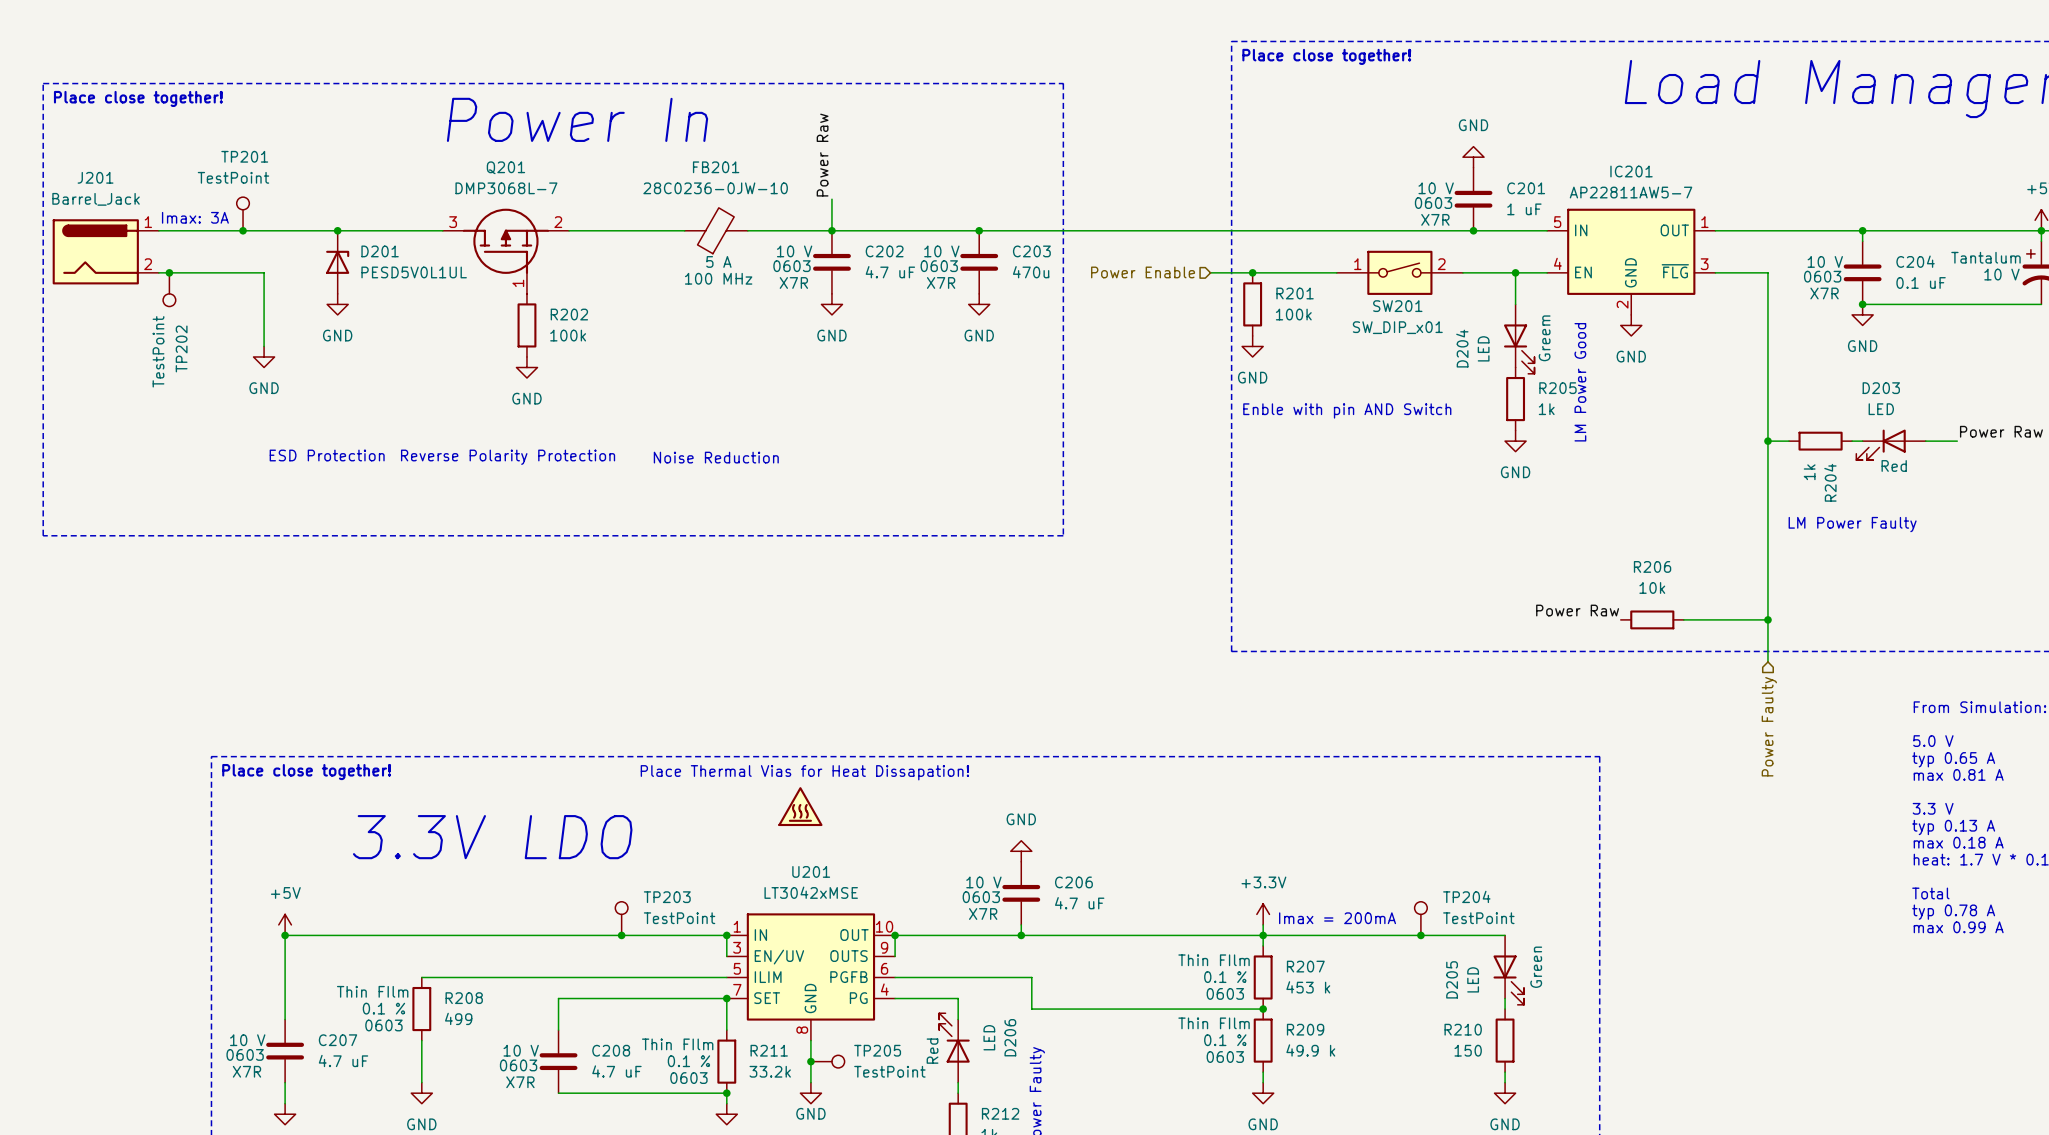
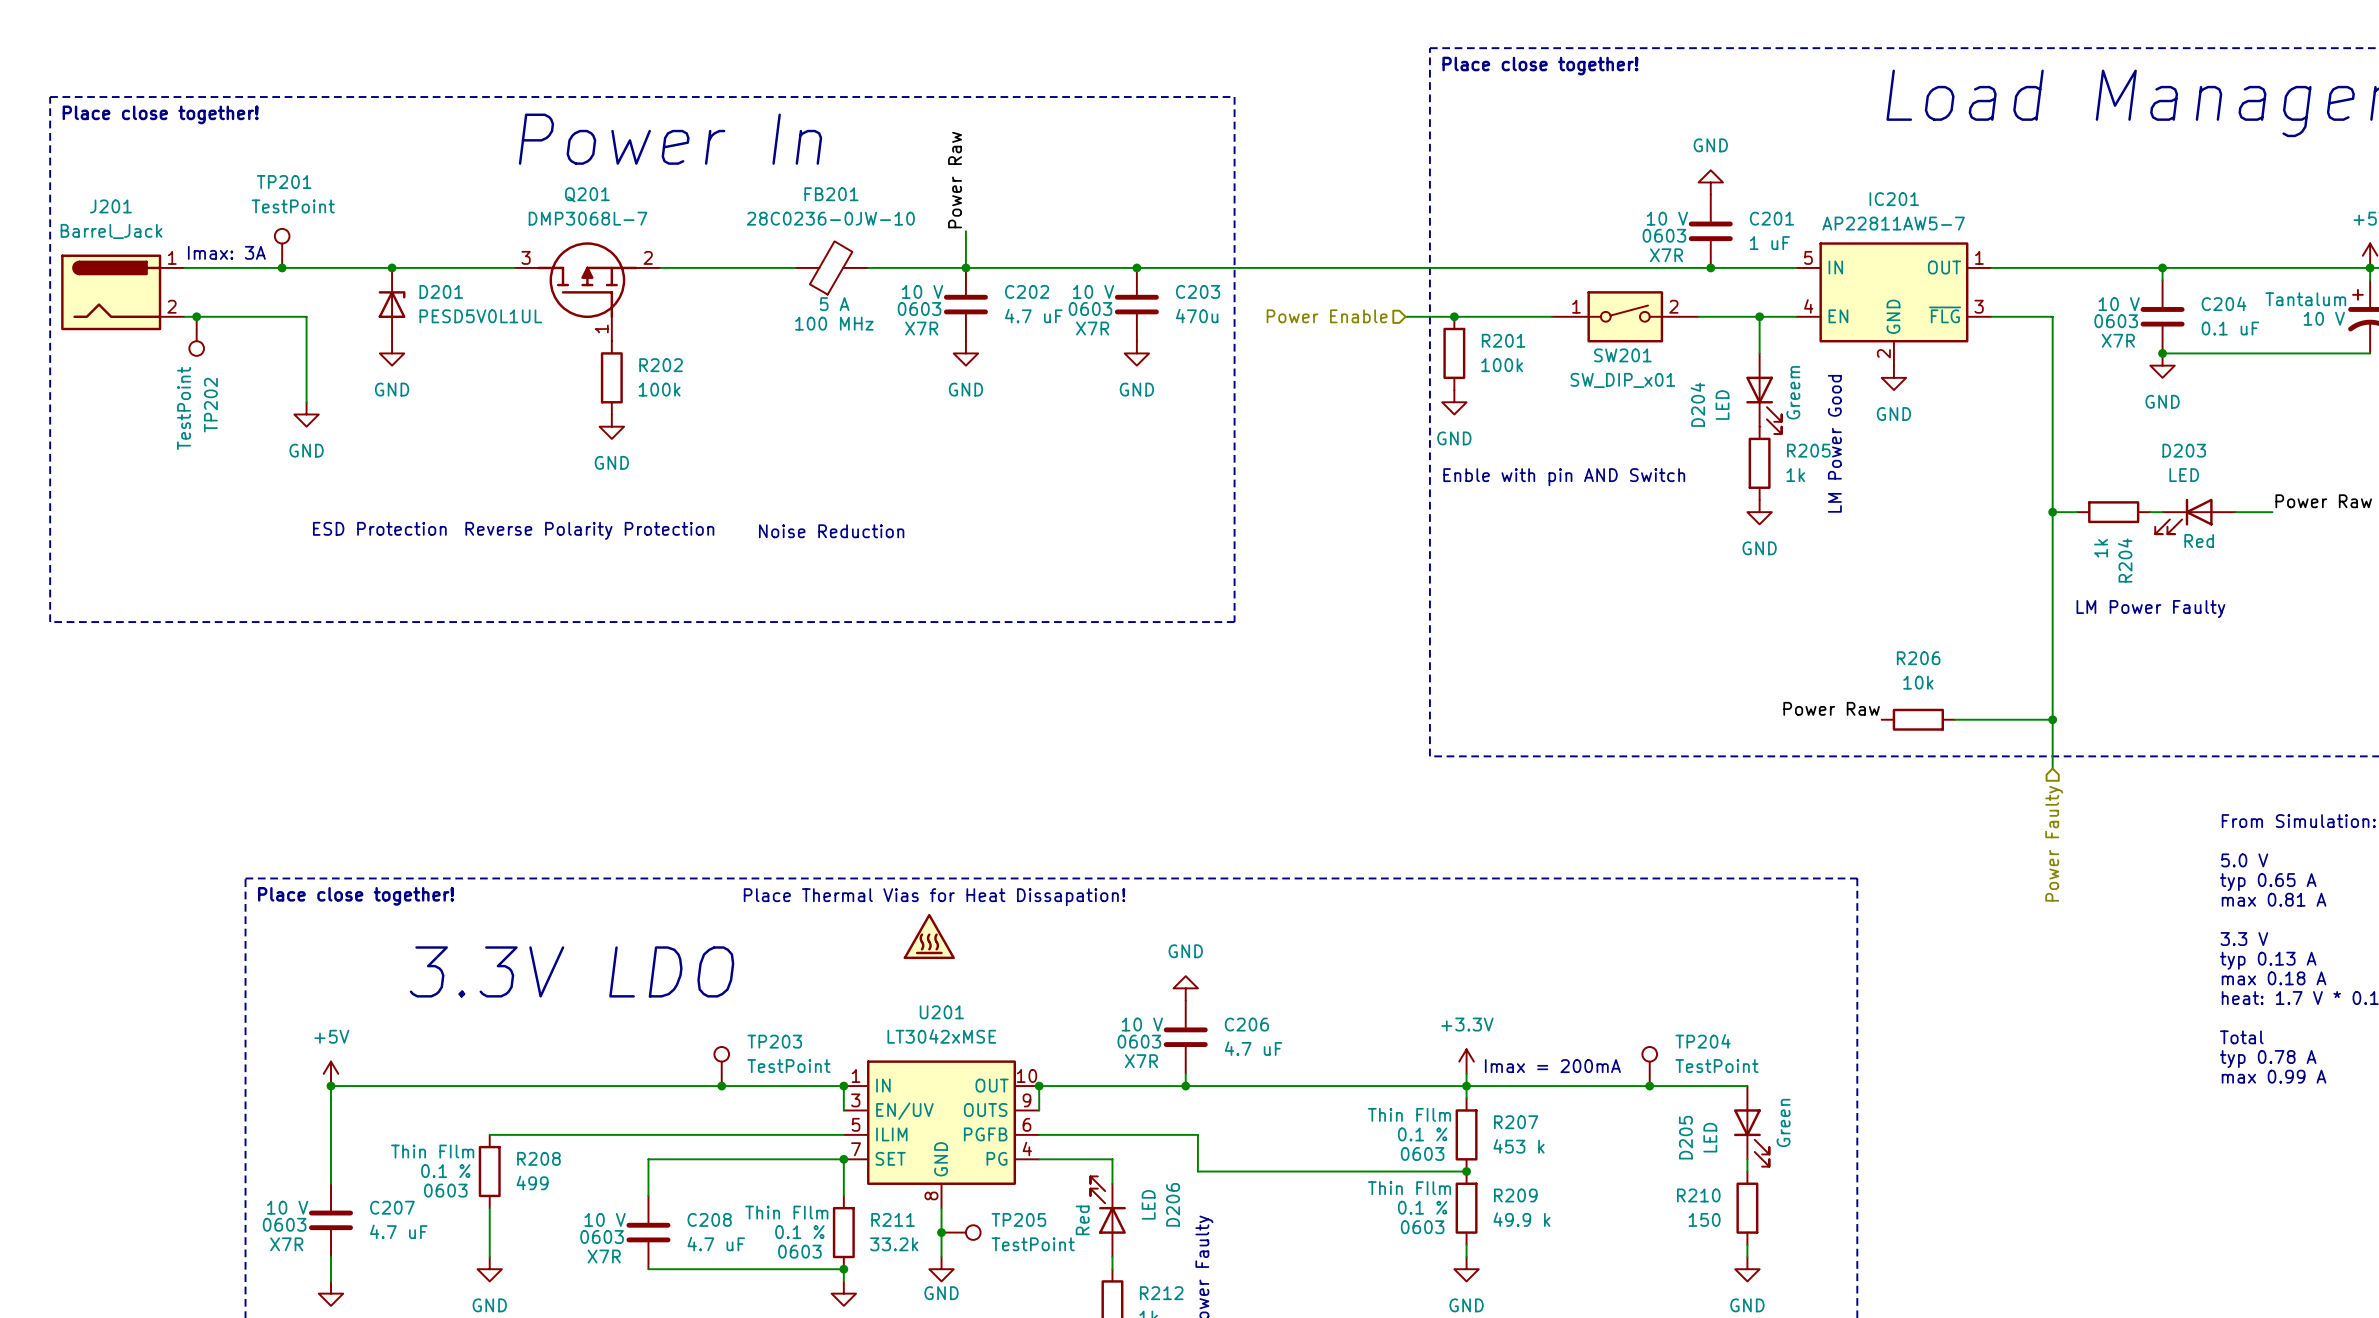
TP201 value position: TestPoint (233, 177) -> TestPoint (293, 206)

